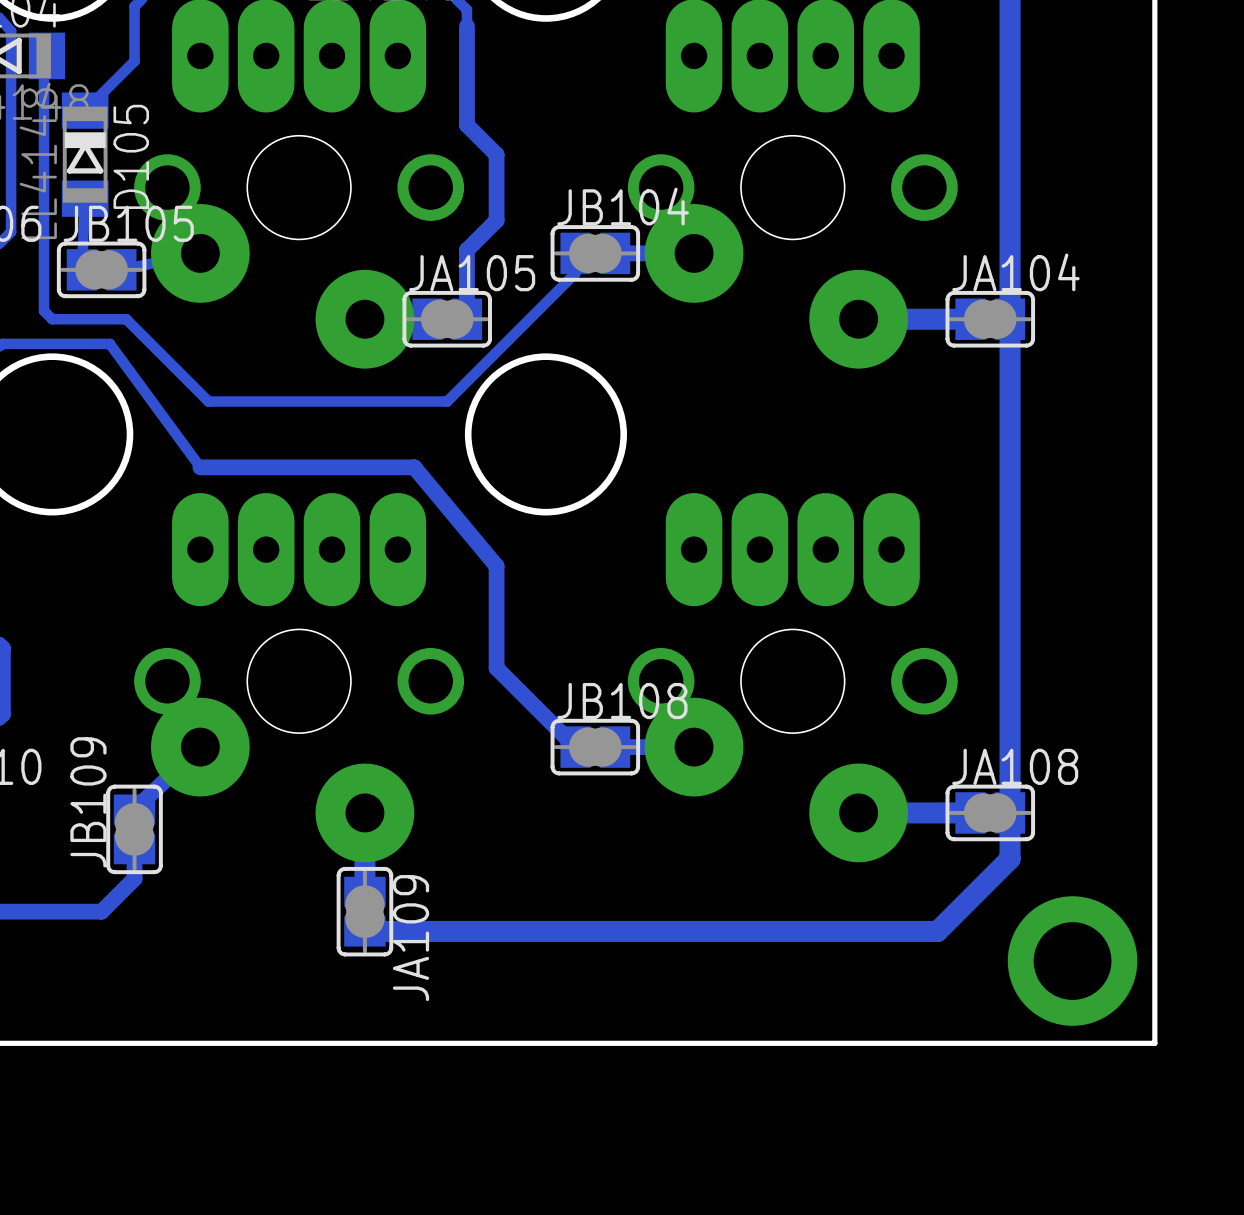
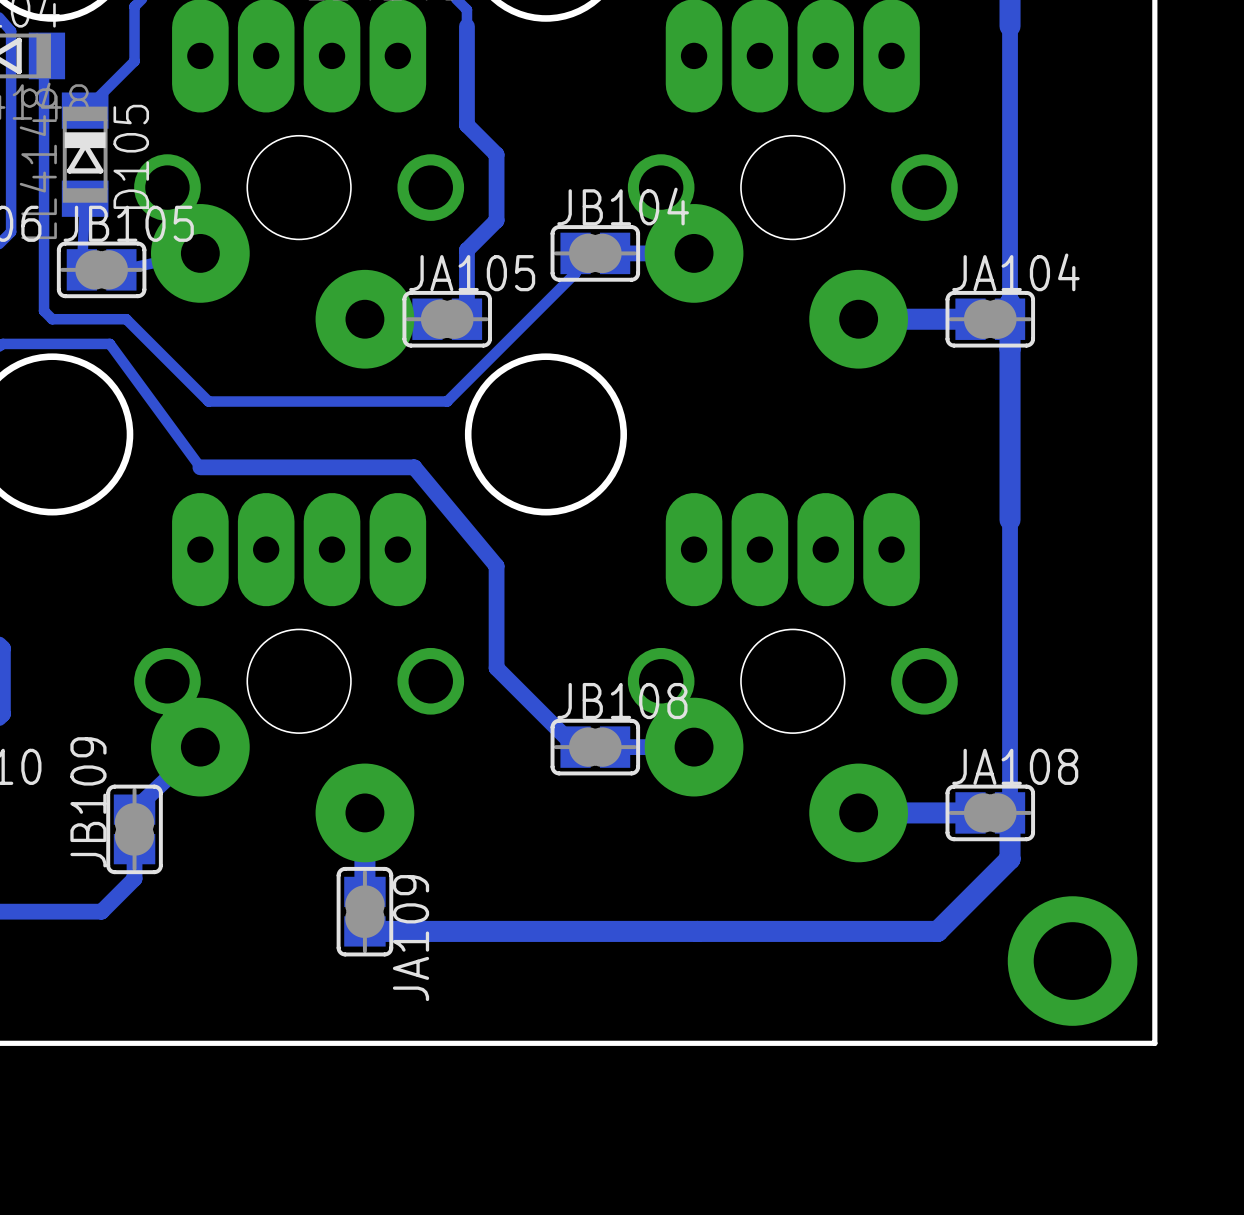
bottom track width: thick (1010, 26) (1010, 302) -> thin (1010, 26) (1010, 302)
bottom track width: thick (1010, 520) (1010, 812) -> thin (1010, 520) (1010, 812)

